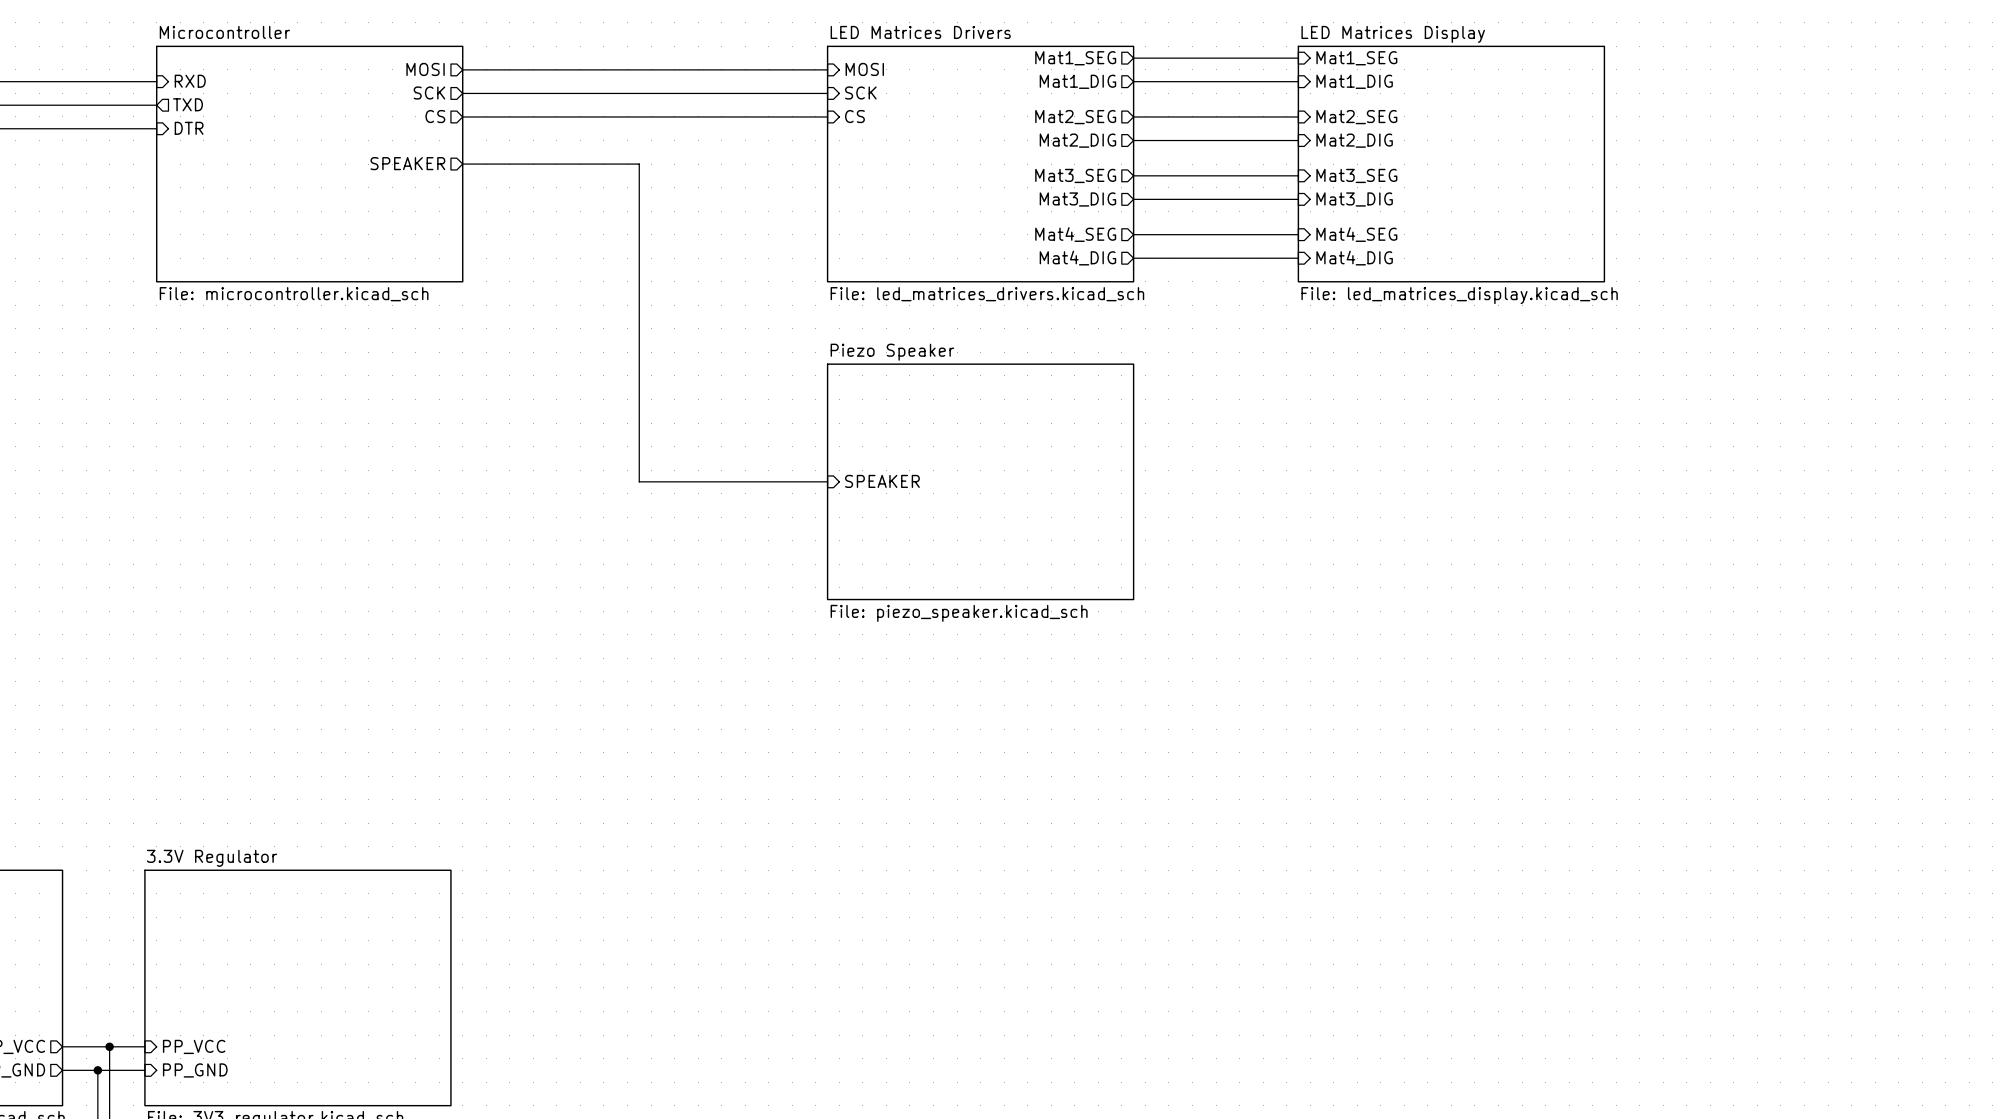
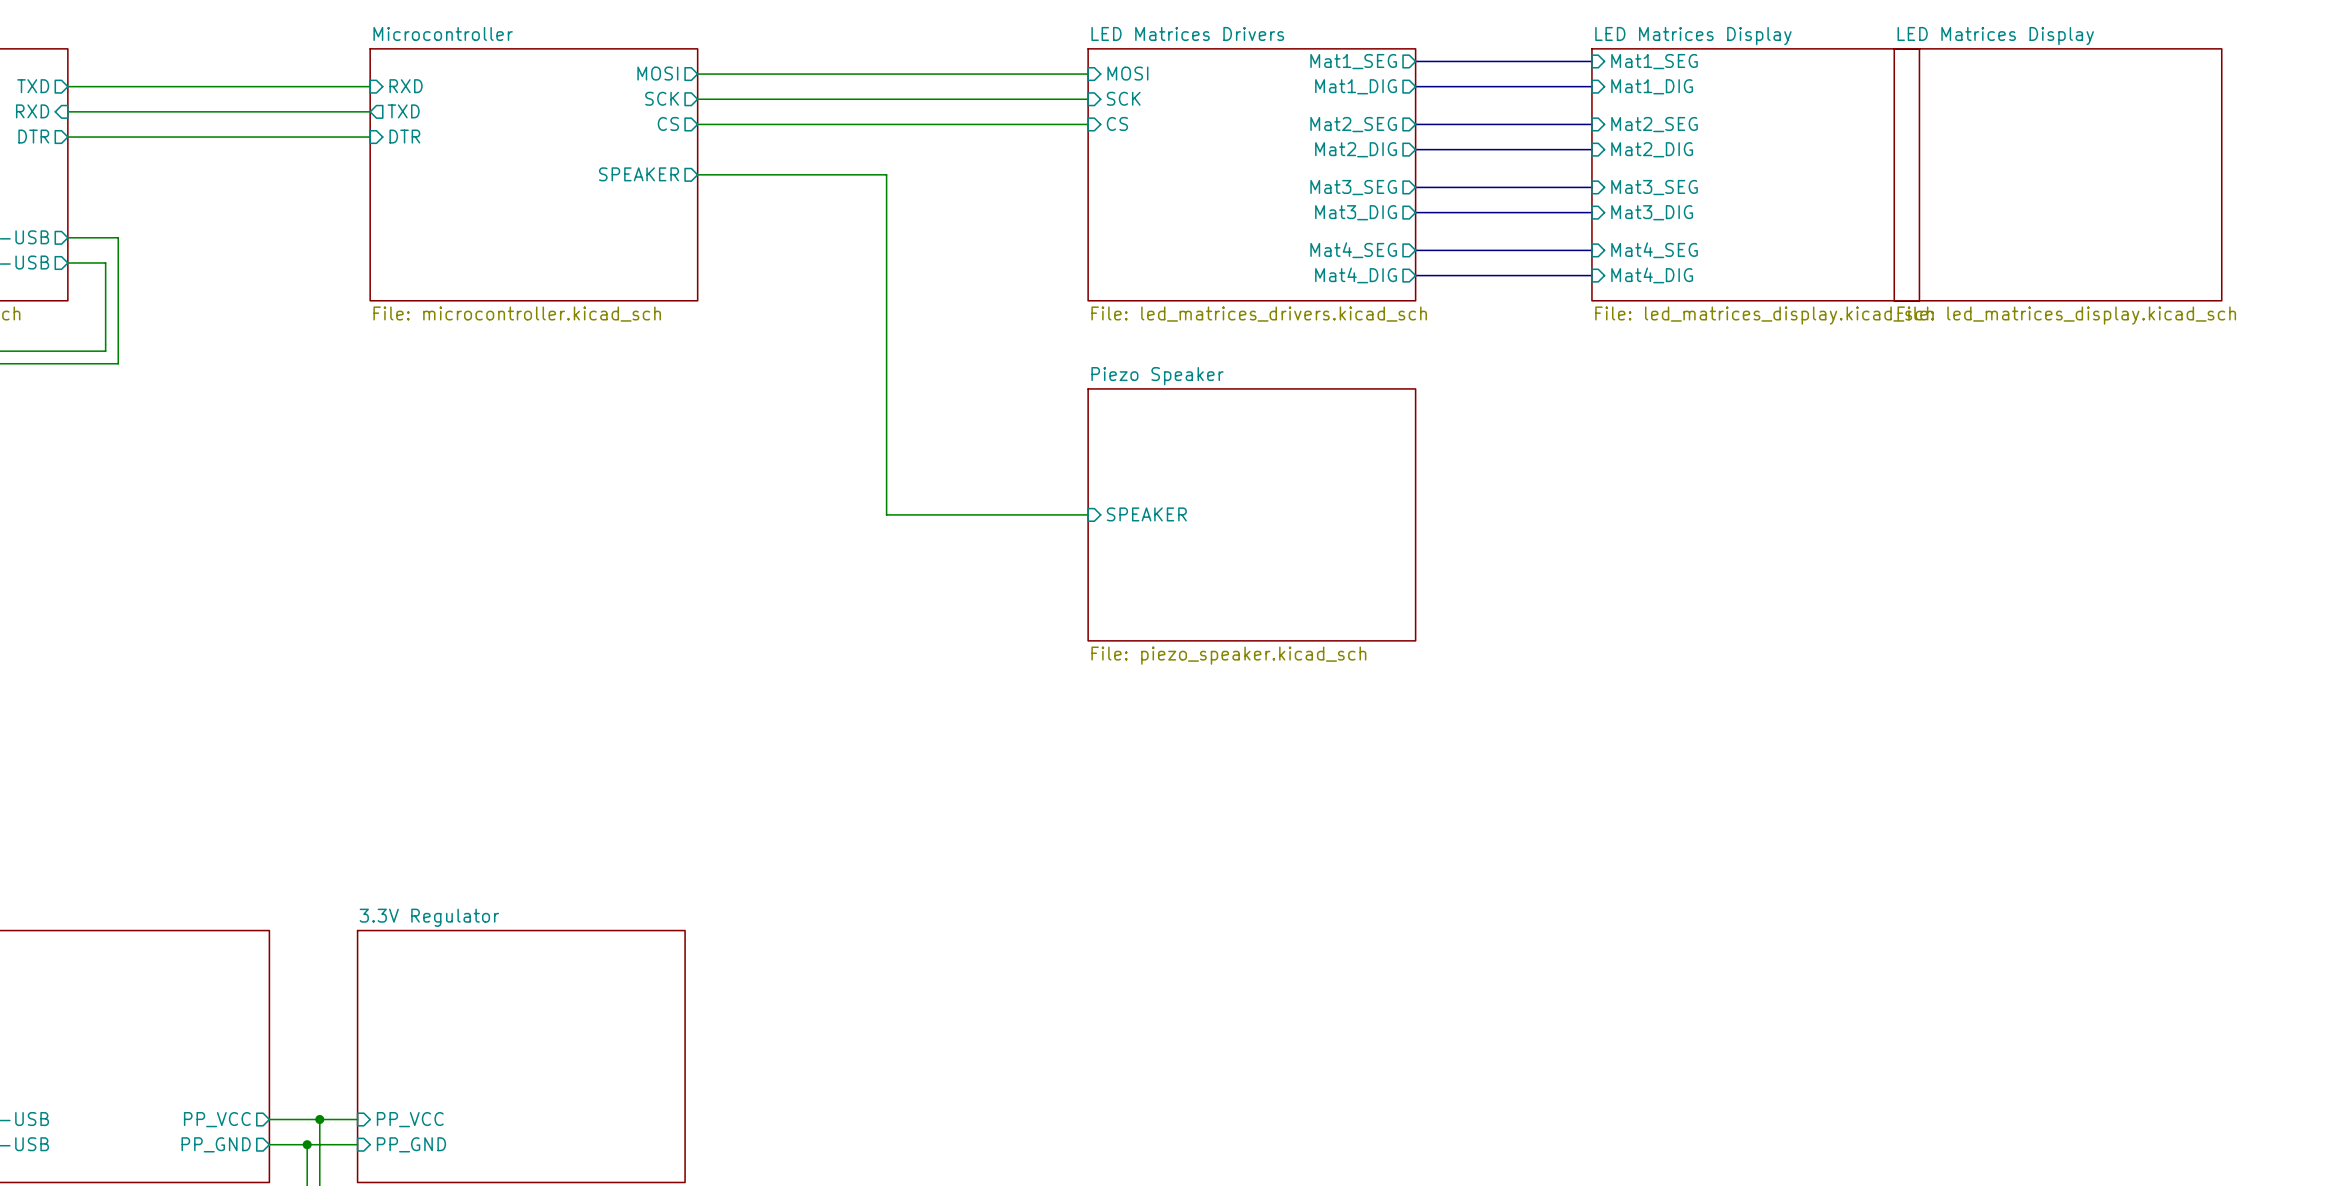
sheet LED Matrices Display: none -> File: led_matrices_display.kicad_sch (2058, 174)

